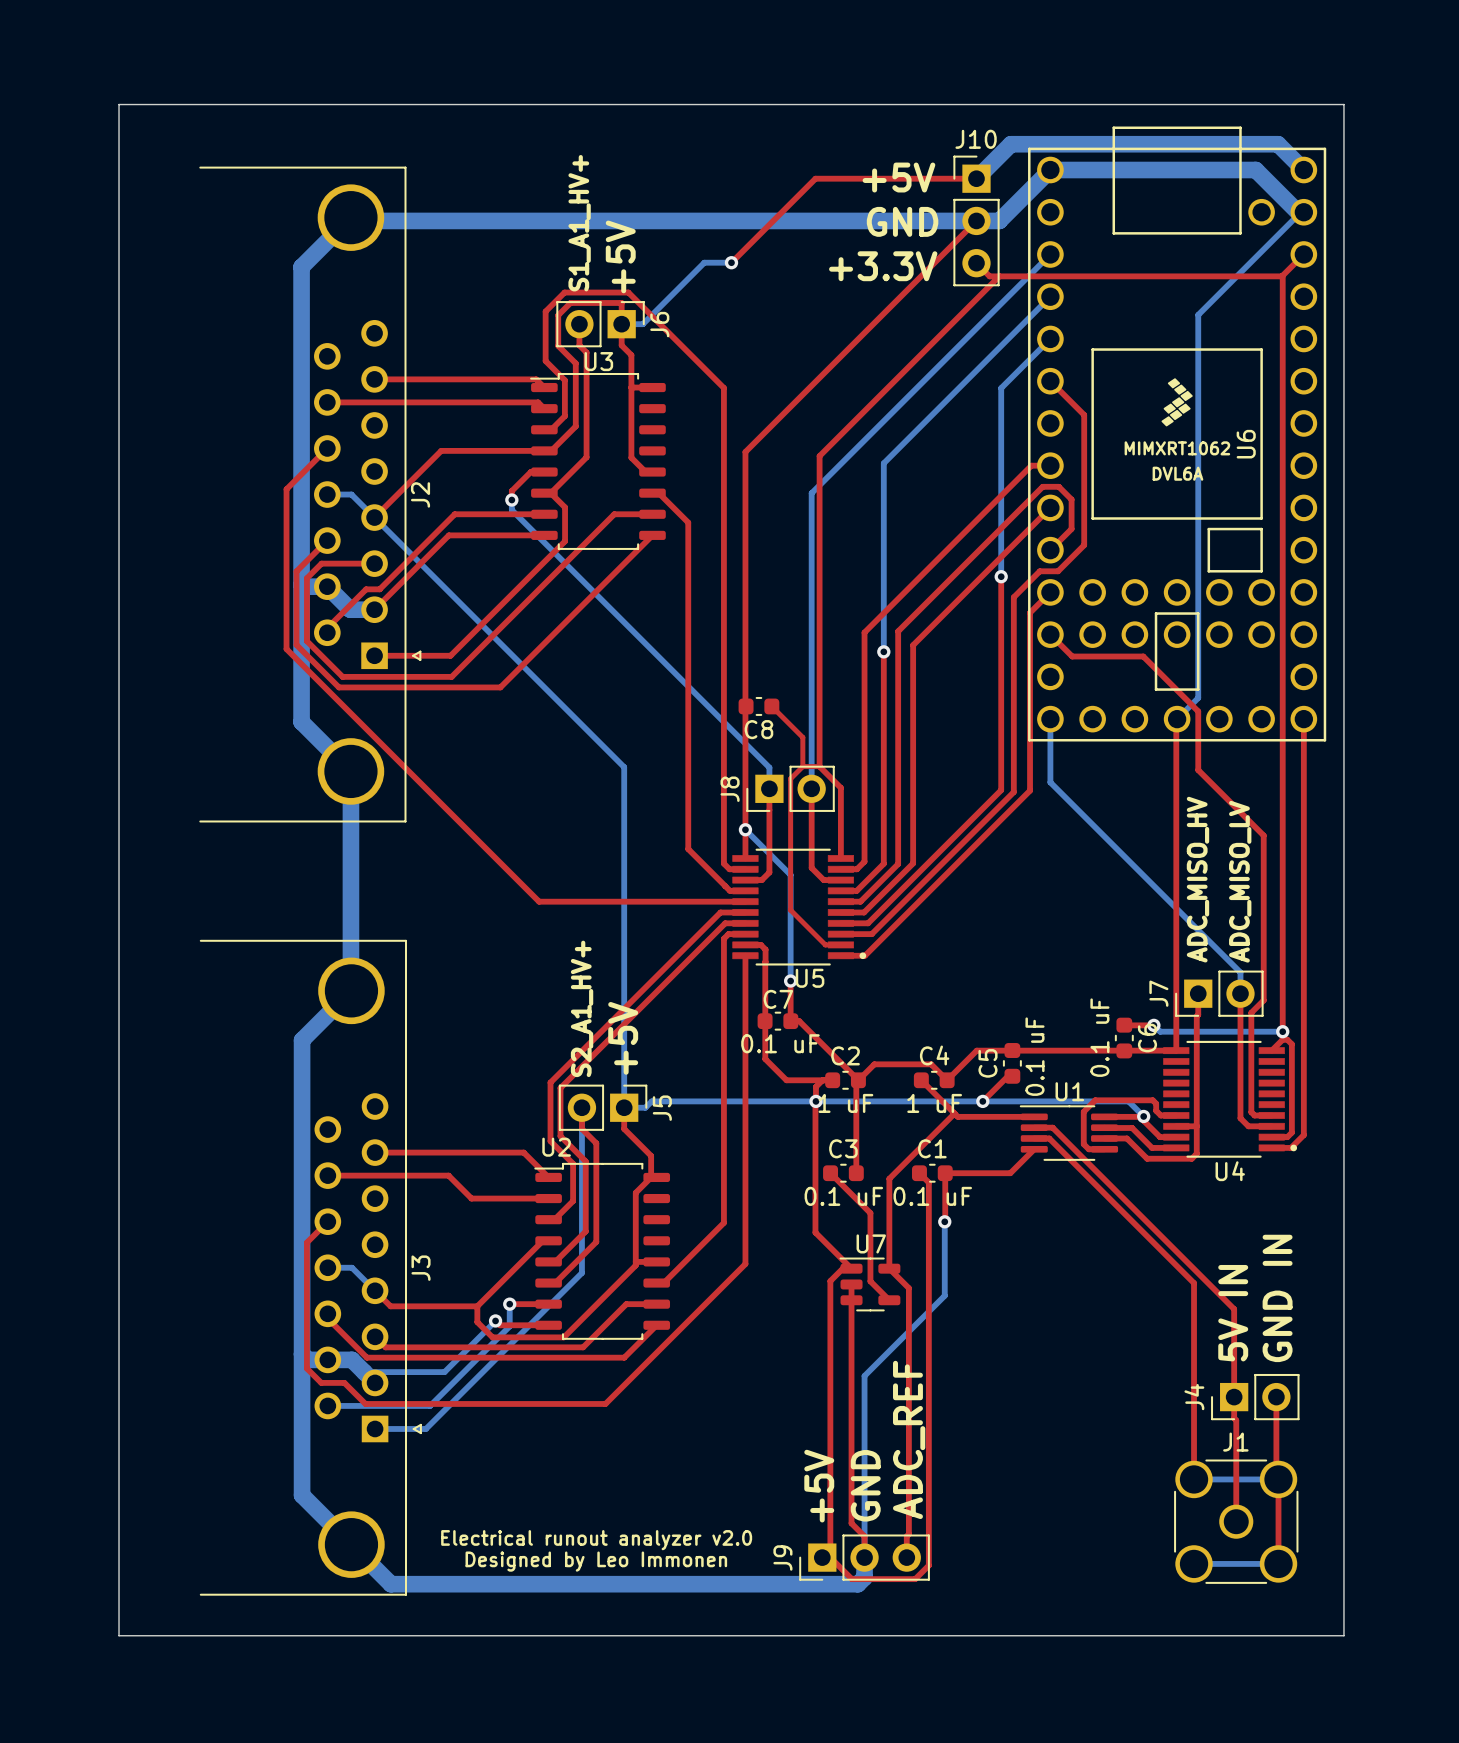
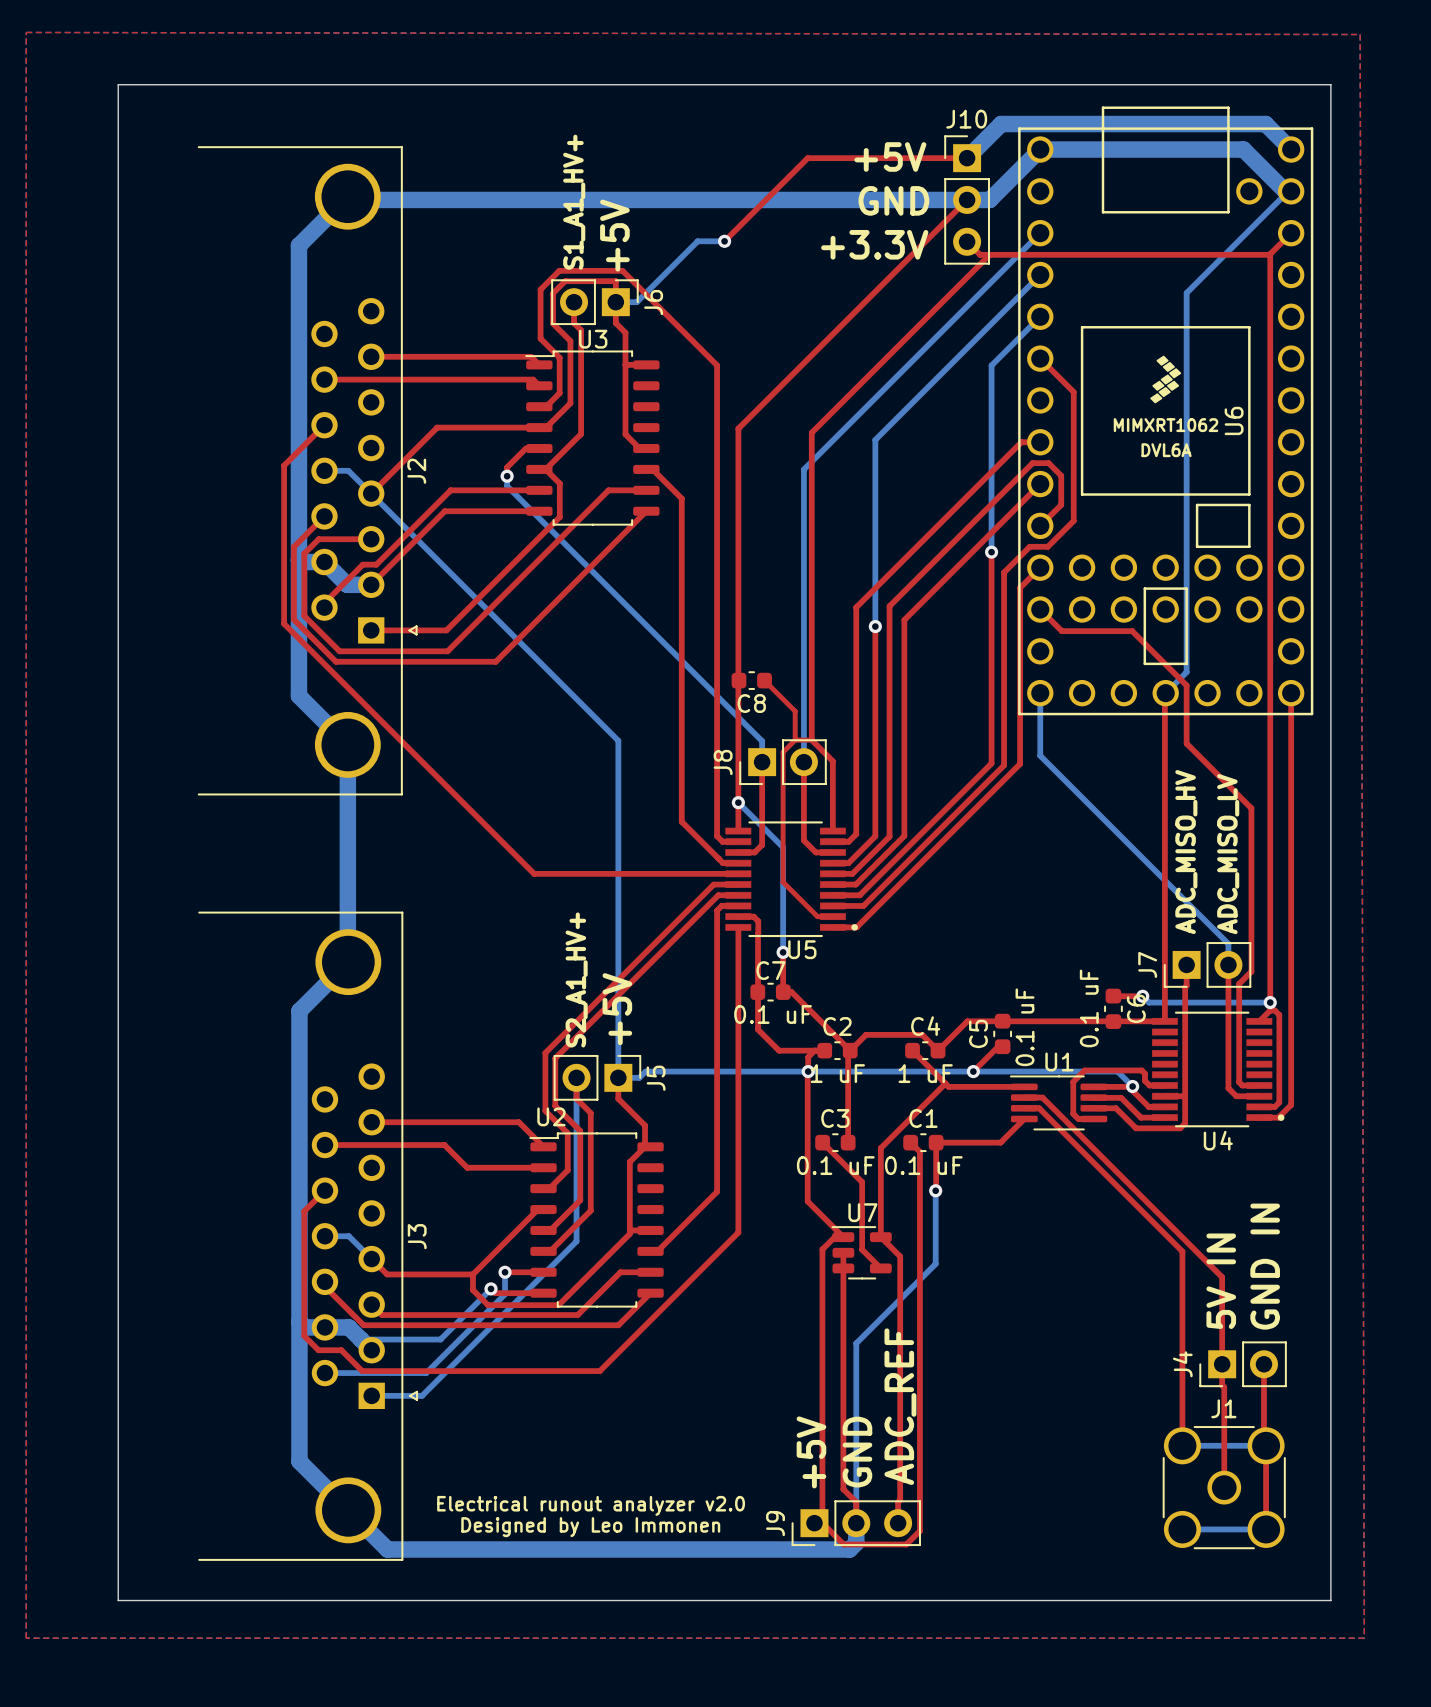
top zone outline: none -> (26, 32) (26, 1638) (1364, 1638) (1360, 34) (26, 32)

